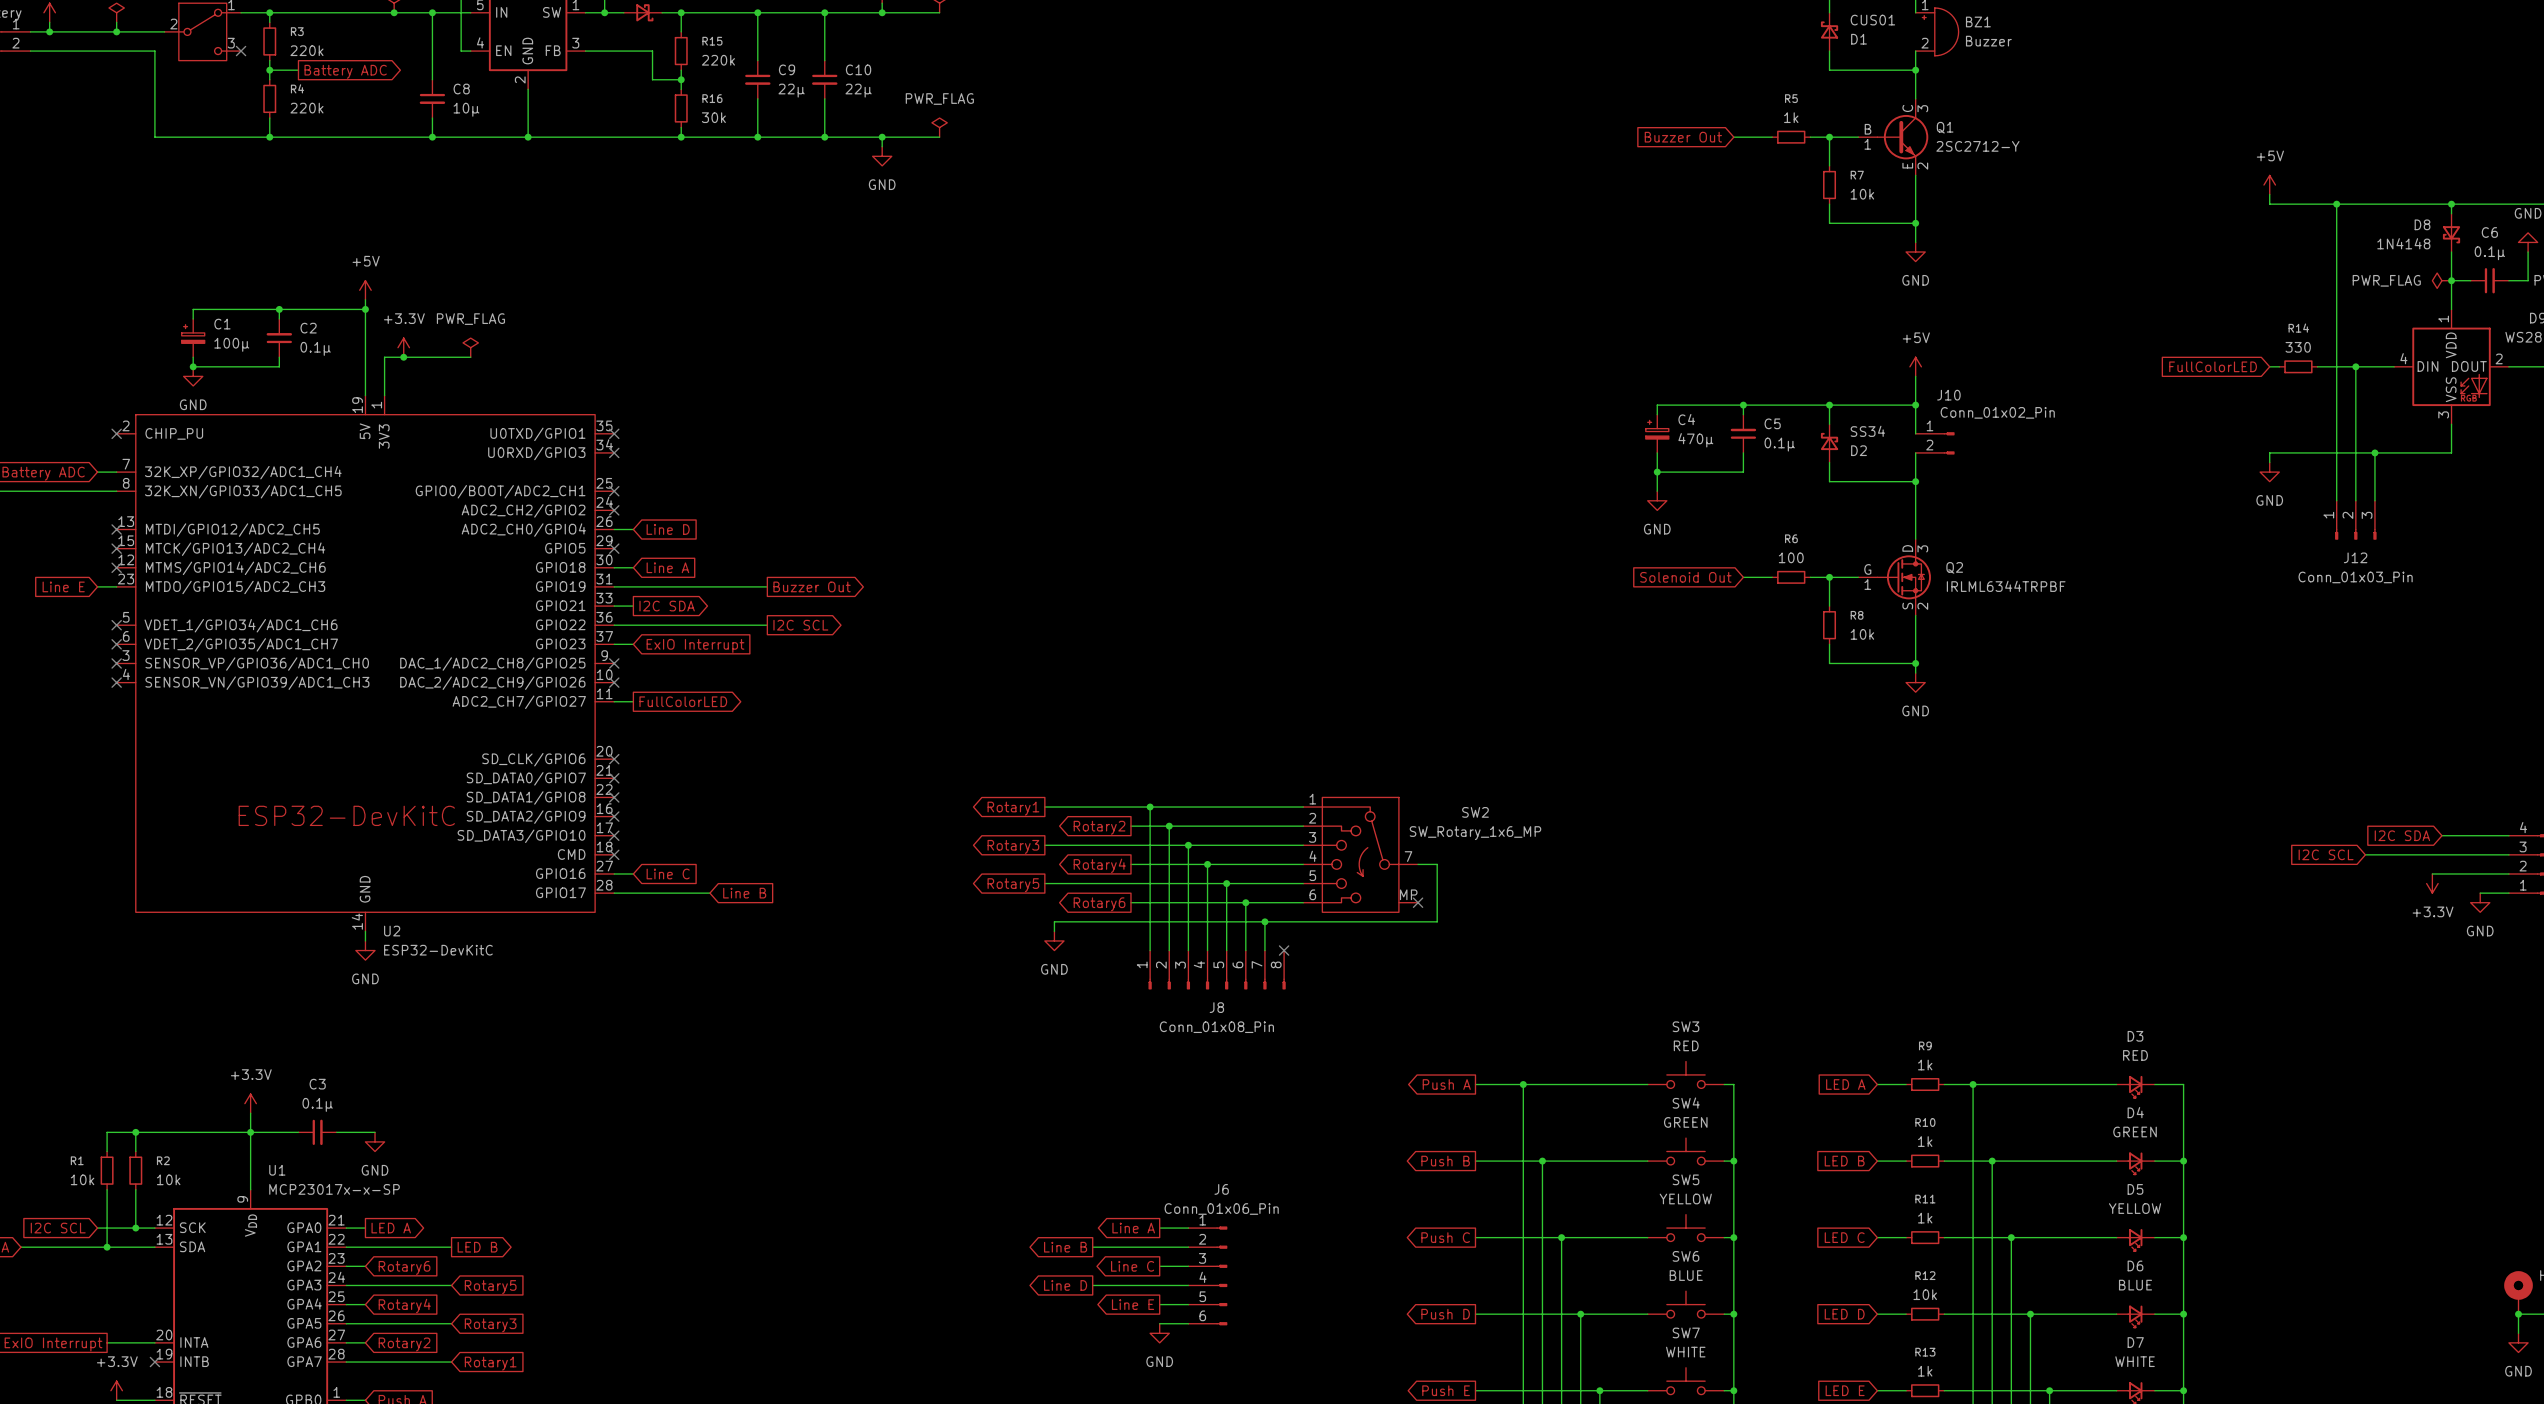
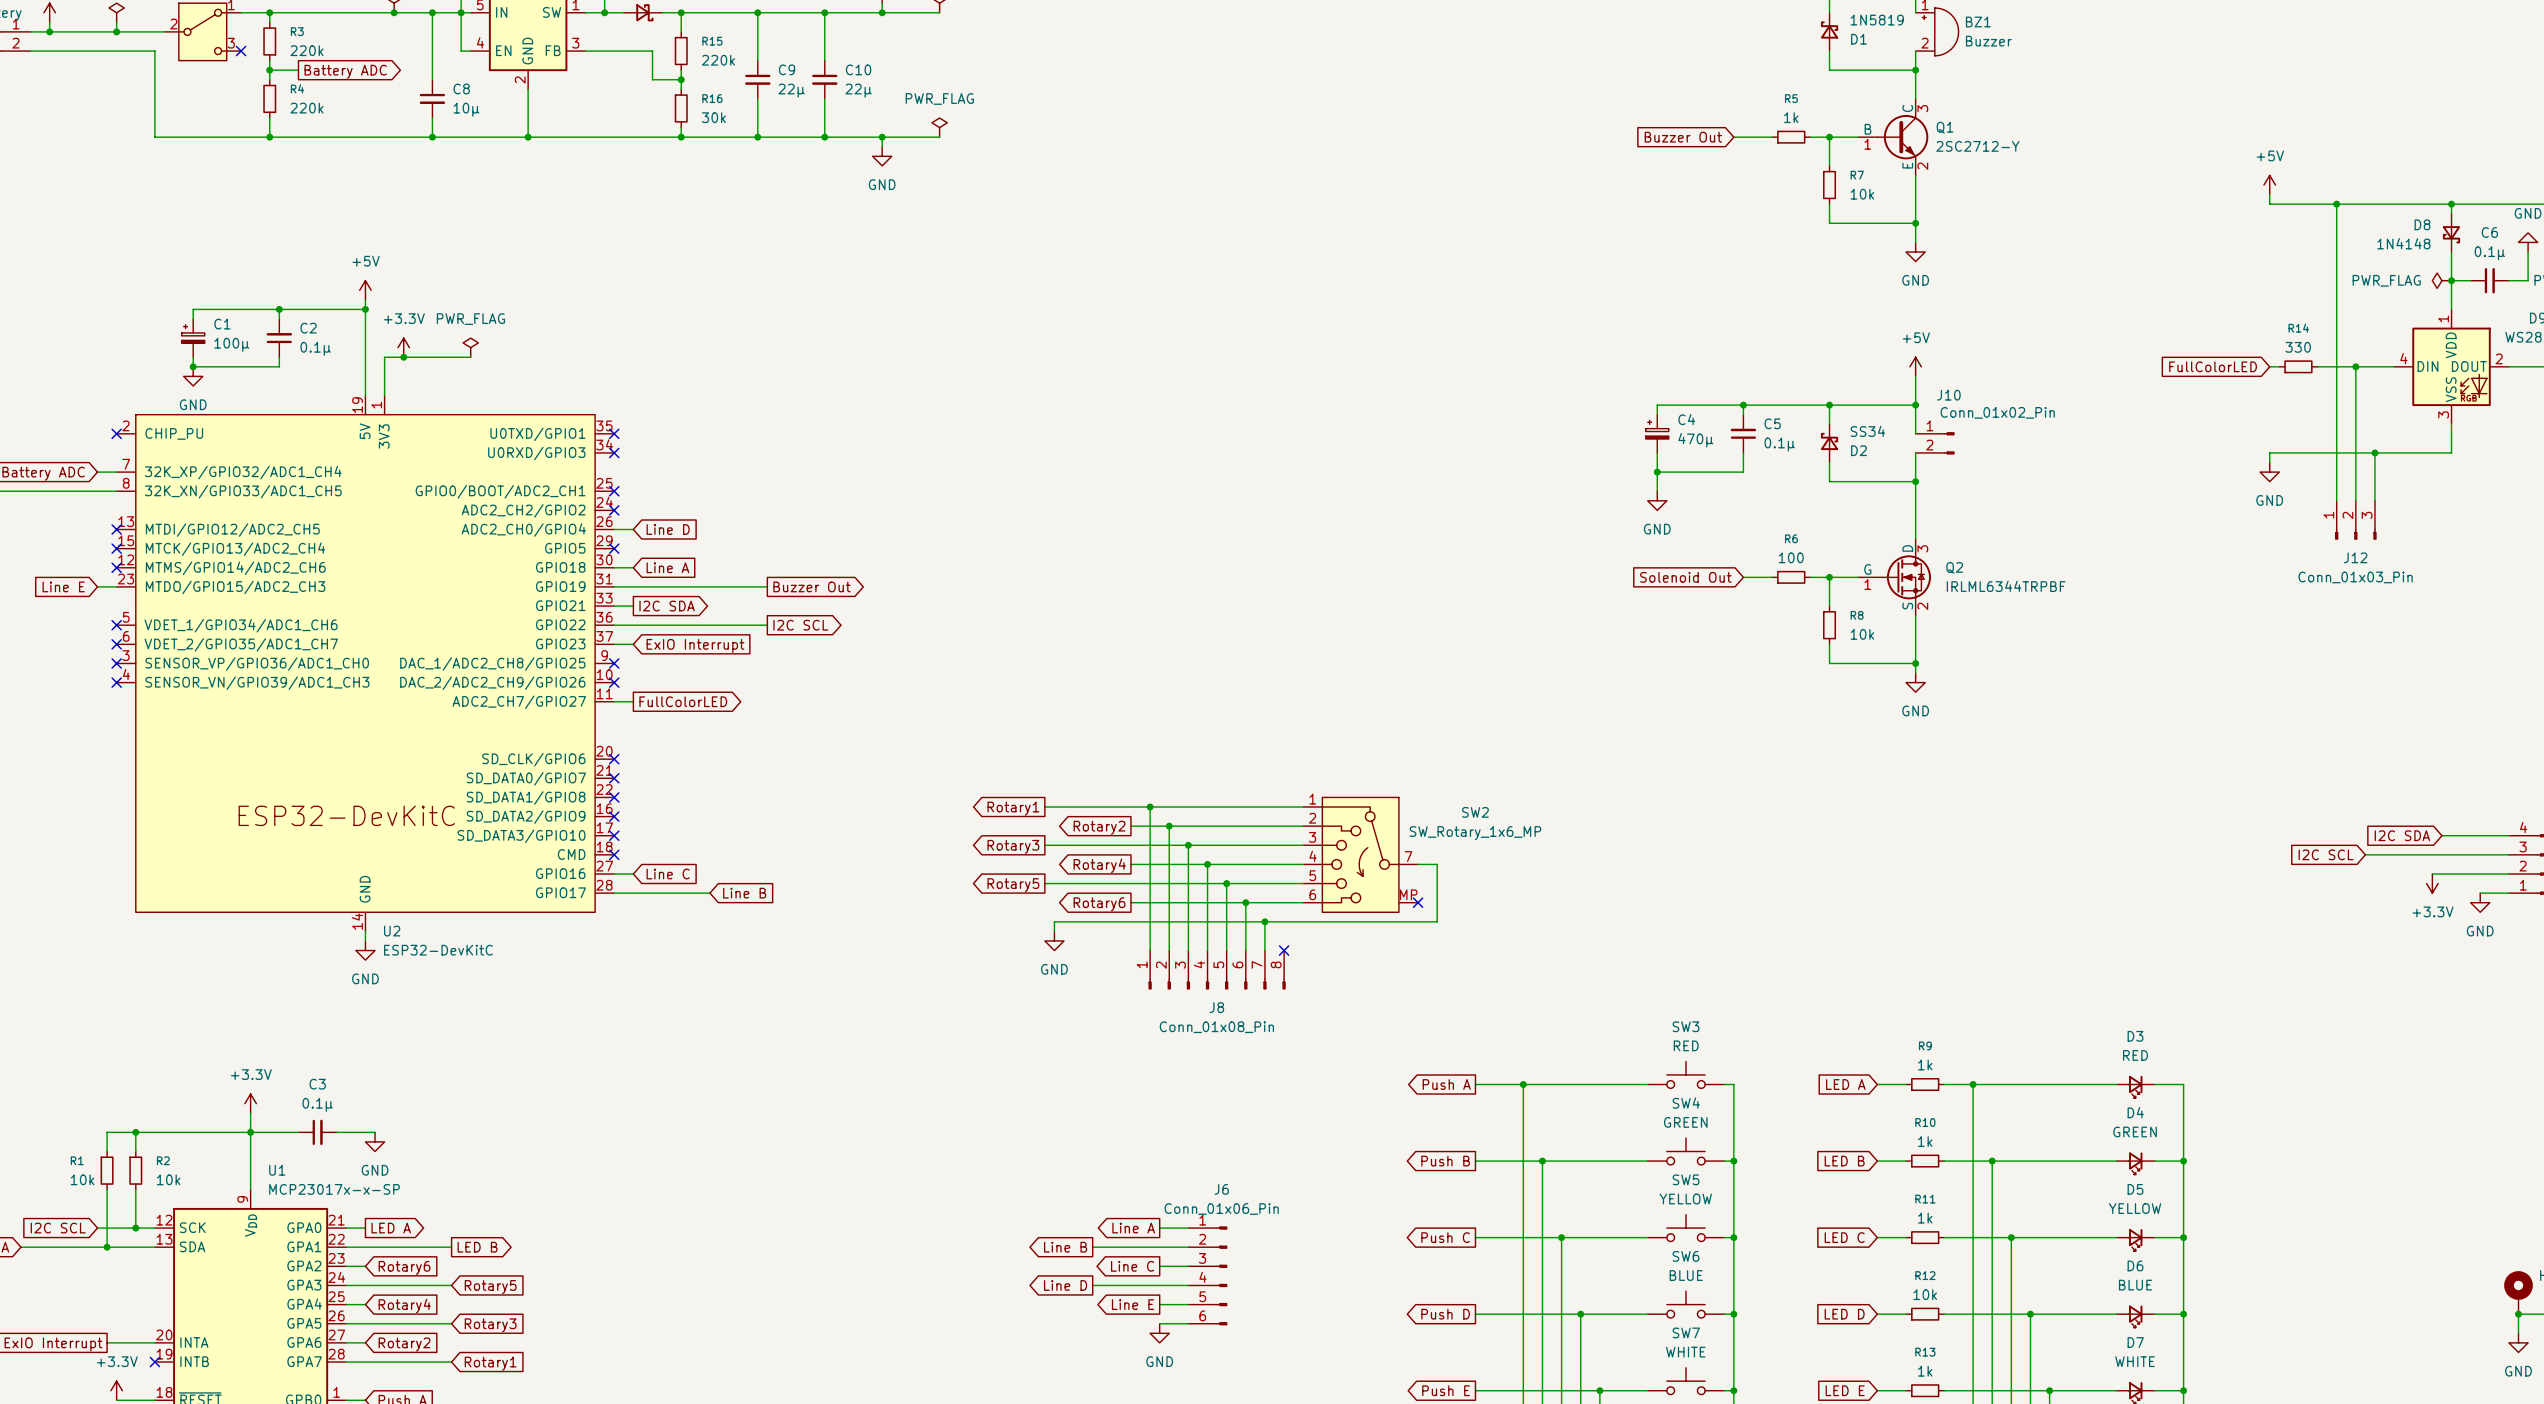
junction: none -> (461, 12)
D1 value: CUS01 (1872, 20) -> 1N5819 (1877, 20)

